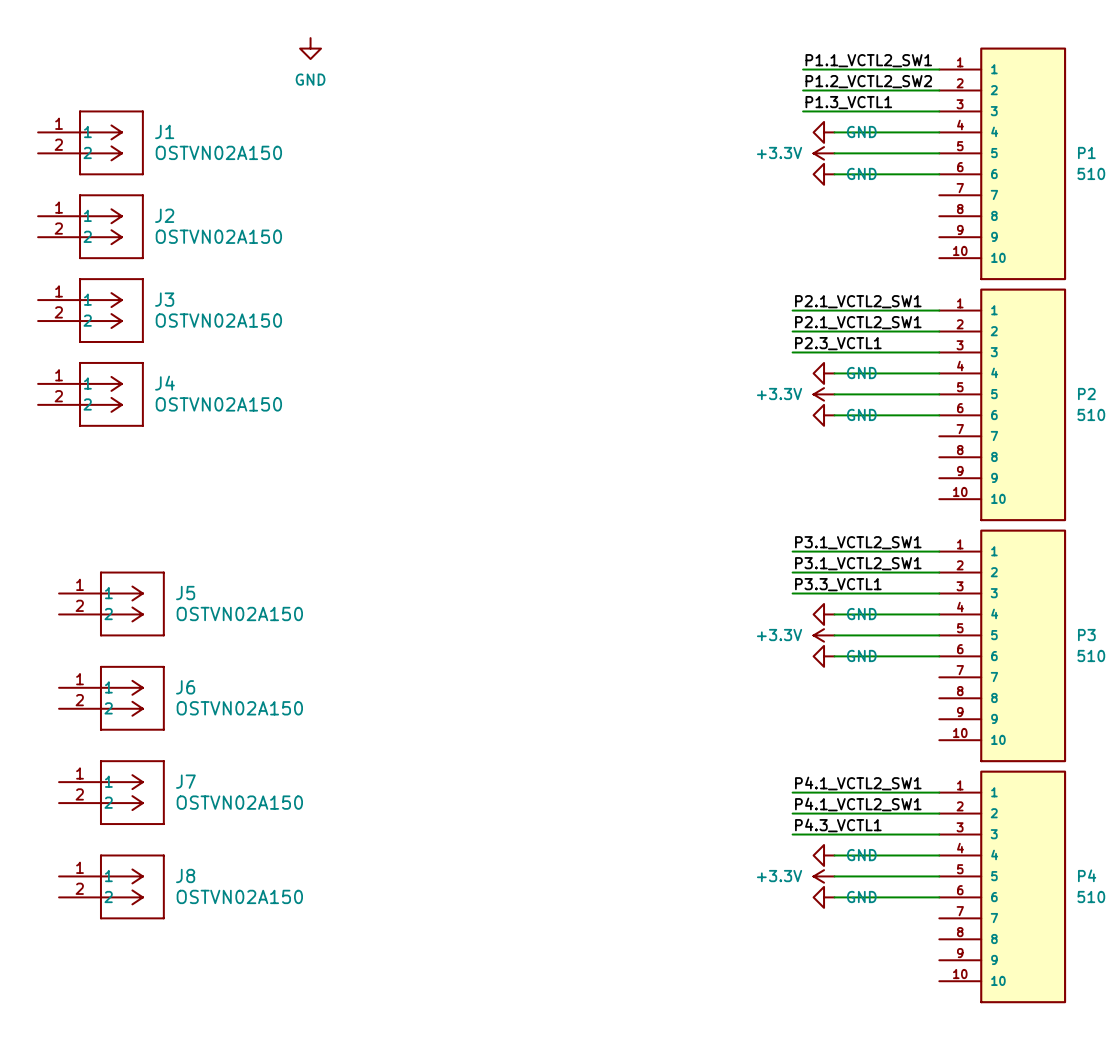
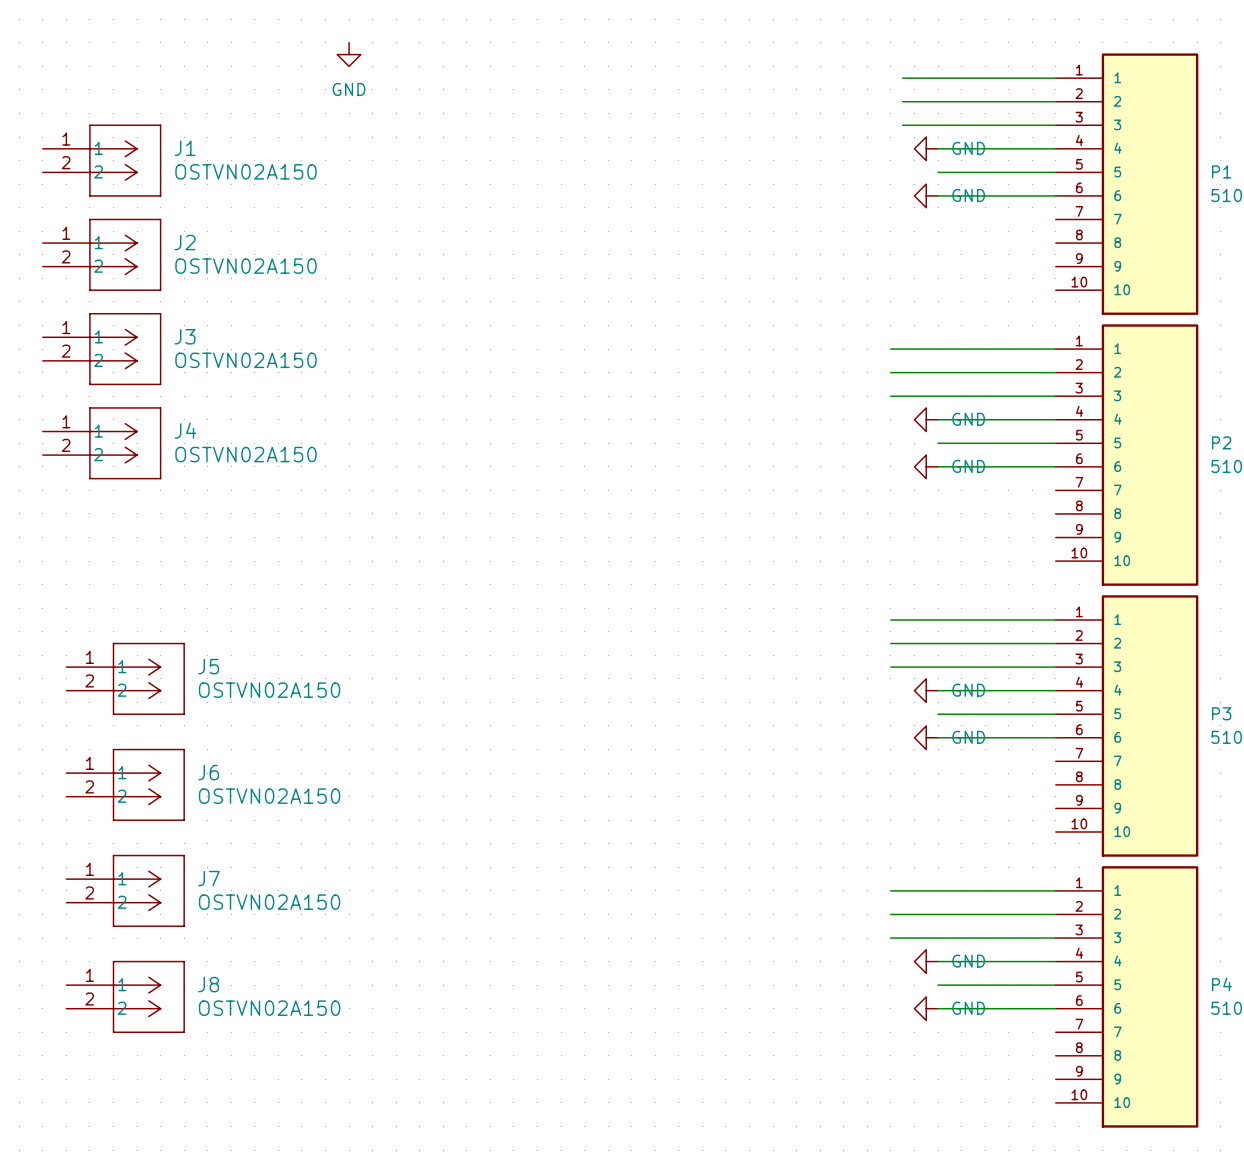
label: P1.1_VCTL2_SW1 (868, 60) -> none
label: P1.2_VCTL2_SW2 (868, 81) -> none
label: P1.3_VCTL1 (848, 102) -> none
power symbol: +3.3V (824, 153) -> none
label: P2.1_VCTL2_SW1 (858, 301) -> none
label: P2.1_VCTL2_SW1 (858, 322) -> none
label: P2.3_VCTL1 (838, 343) -> none
power symbol: +3.3V (824, 394) -> none
label: P3.1_VCTL2_SW1 (858, 542) -> none
label: P3.1_VCTL2_SW1 (858, 563) -> none
label: P3.3_VCTL1 (838, 584) -> none
power symbol: +3.3V (824, 635) -> none
label: P4.1_VCTL2_SW1 (858, 783) -> none
label: P4.1_VCTL2_SW1 (858, 804) -> none
label: P4.3_VCTL1 (838, 825) -> none
power symbol: +3.3V (824, 876) -> none

